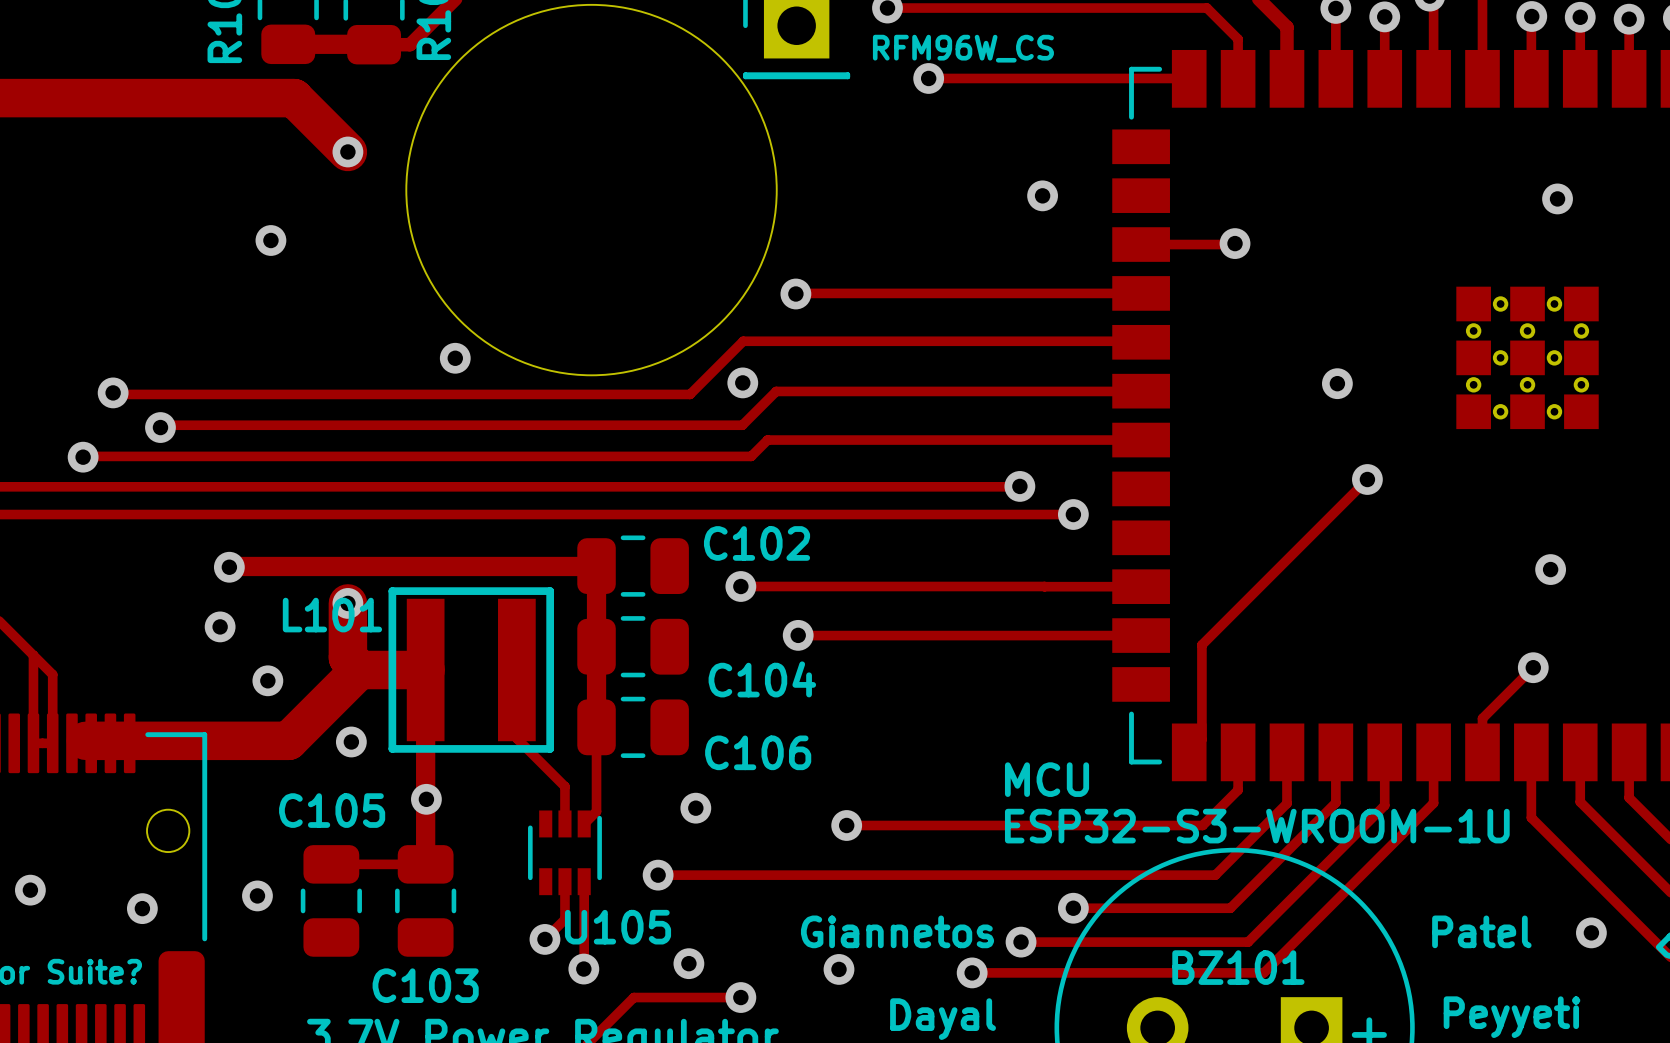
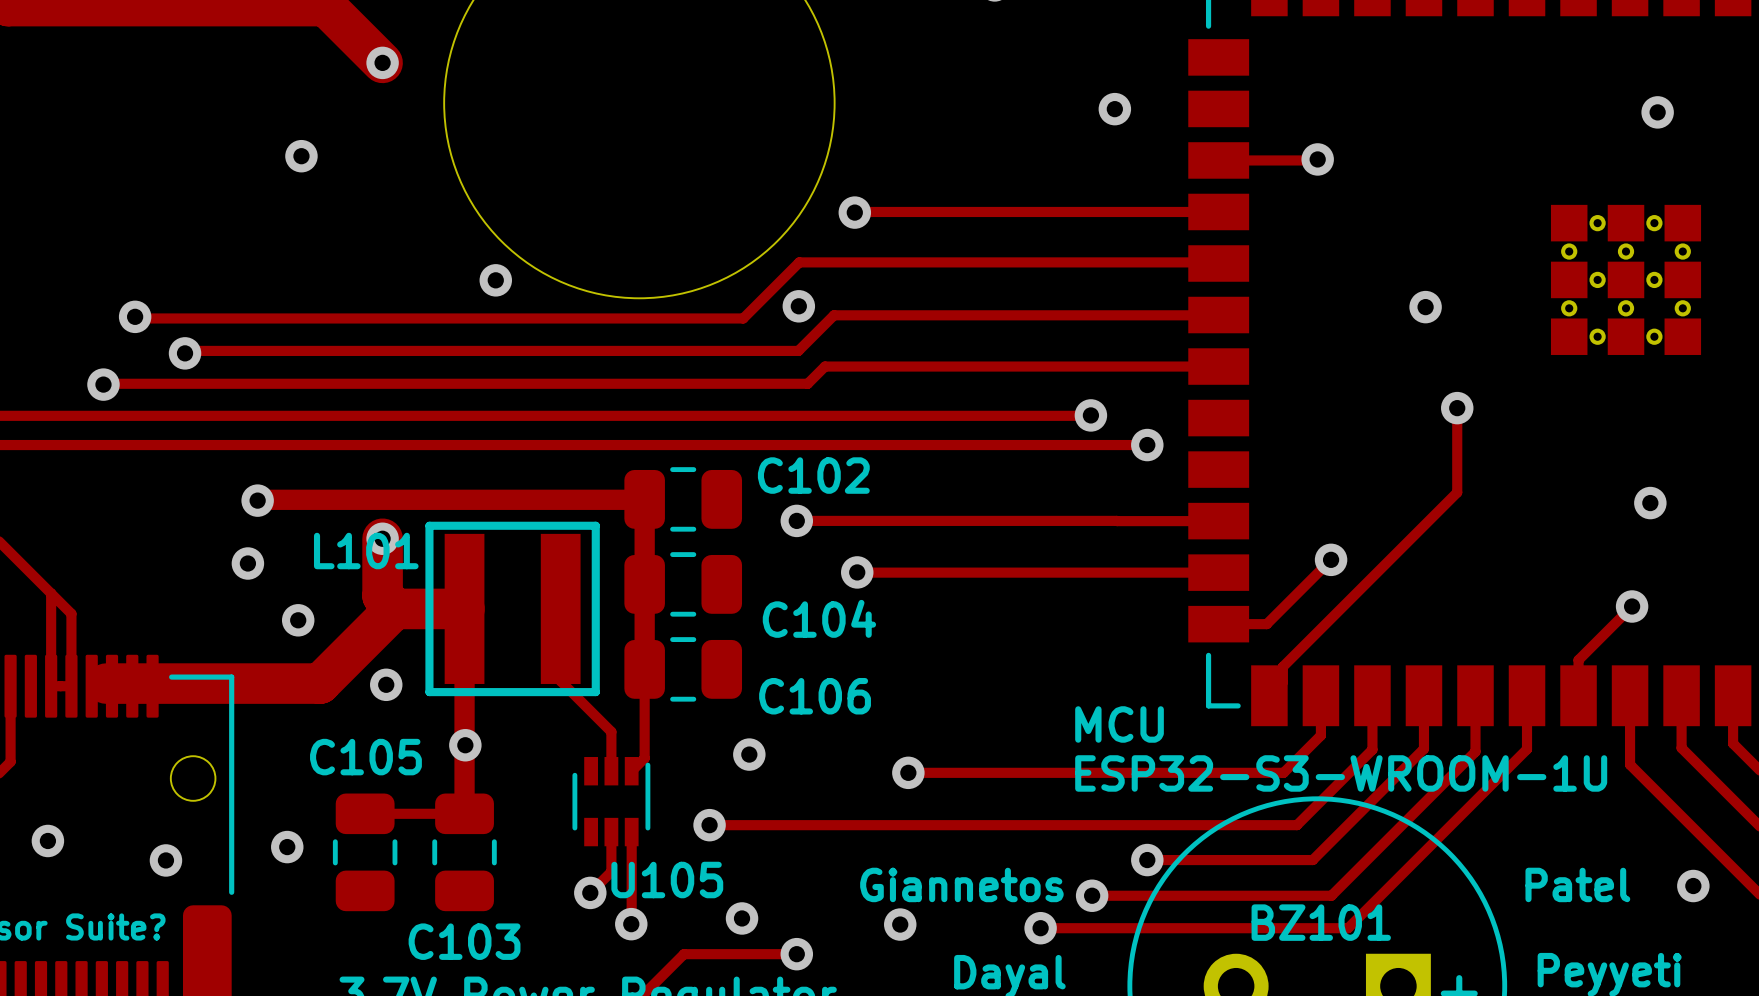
track: (1367, 479) (1201, 644) (1201, 725) -> (1457, 408) (1457, 492) (1282, 666)
track: none -> (1331, 559) (1266, 624) (1218, 624)
via: none -> (1331, 559)

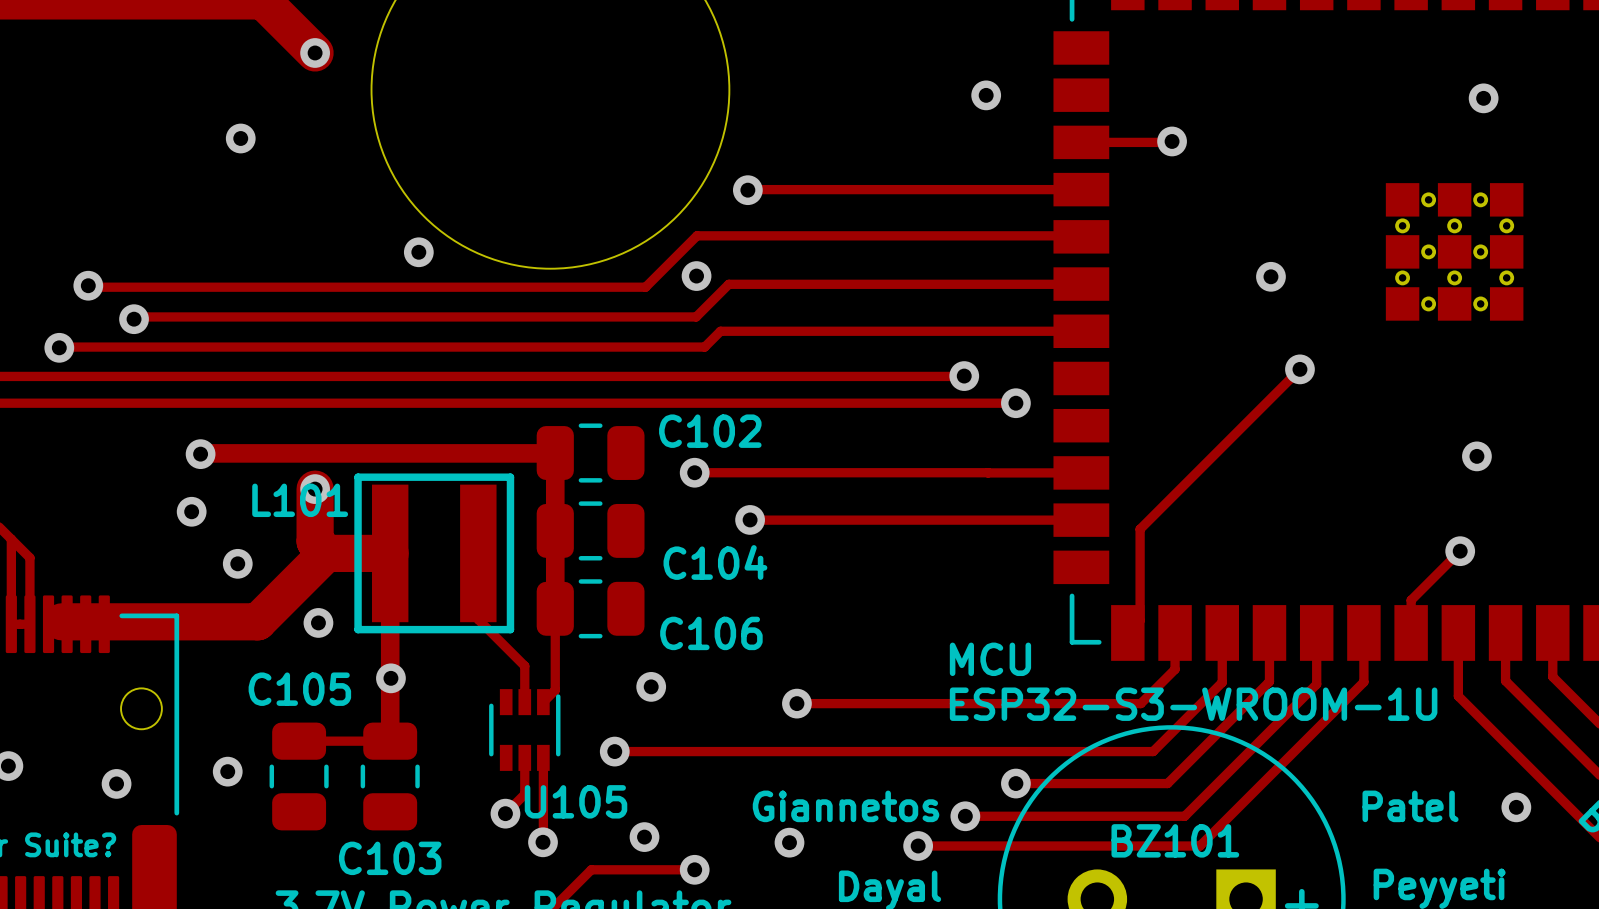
track: (1457, 408) (1457, 492) (1282, 666) -> (1299, 369) (1140, 529) (1140, 606)
track: (1331, 559) (1266, 624) (1218, 624) -> none
via: (1331, 559) -> none

